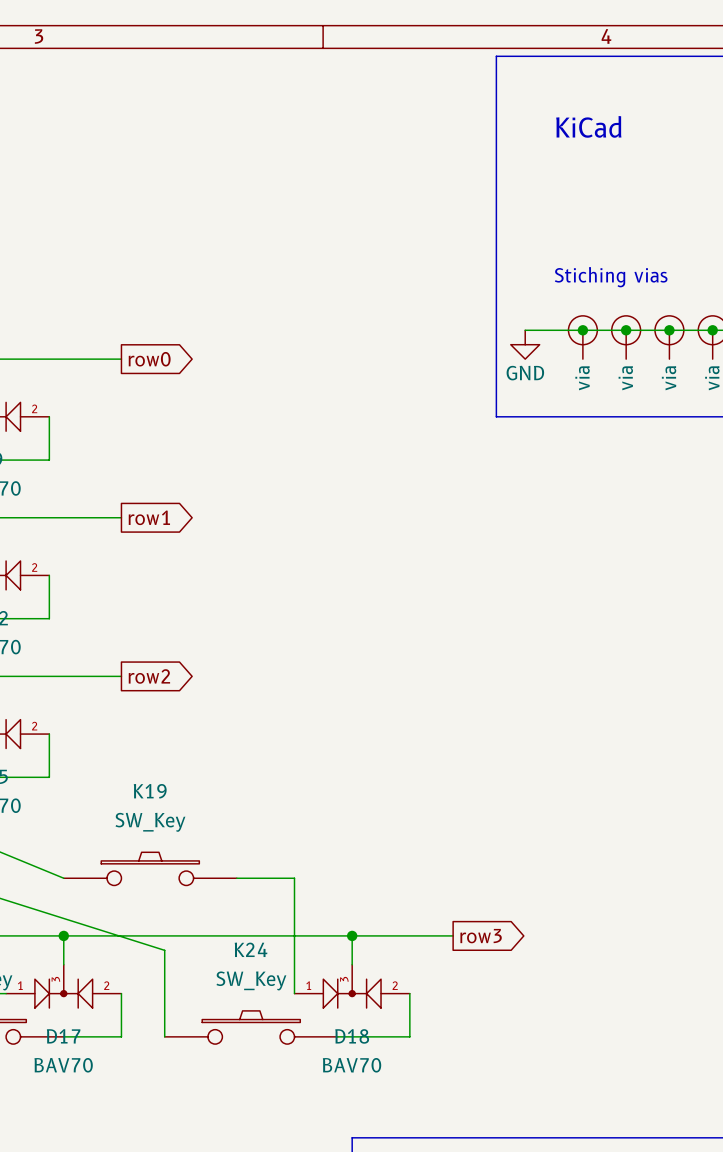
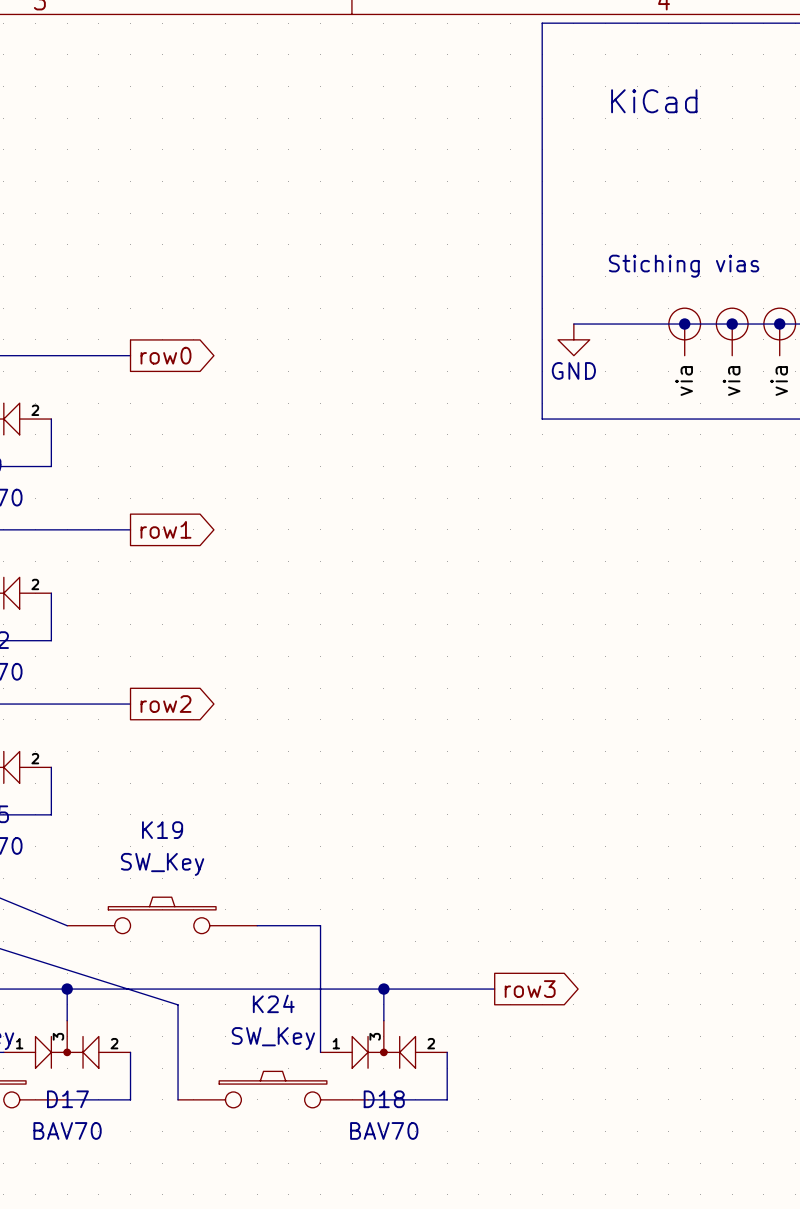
junction: (582, 330) -> none
part: (582, 337) -> none

